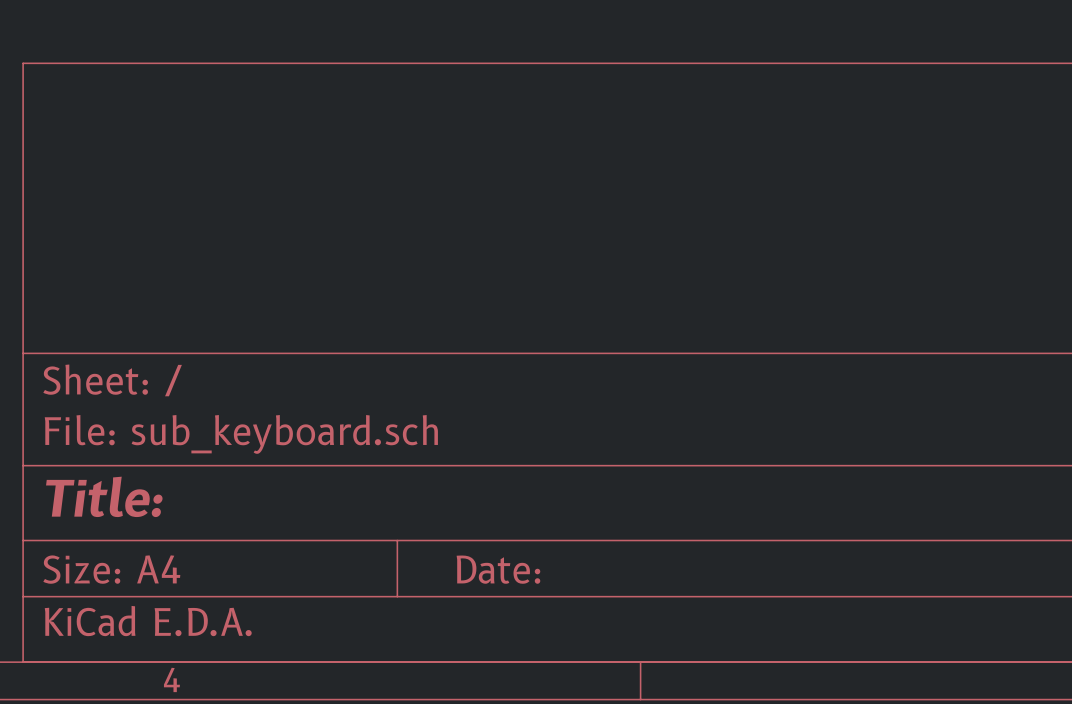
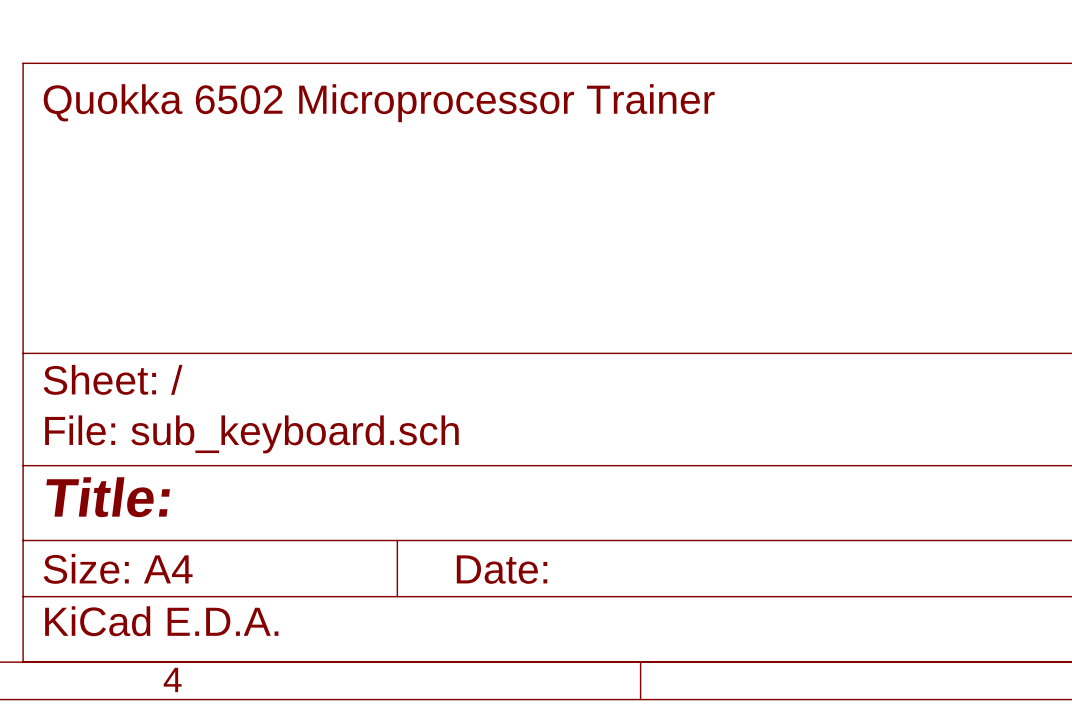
title block: none -> Quokka 6502 Microprocessor Trainer (379, 103)

